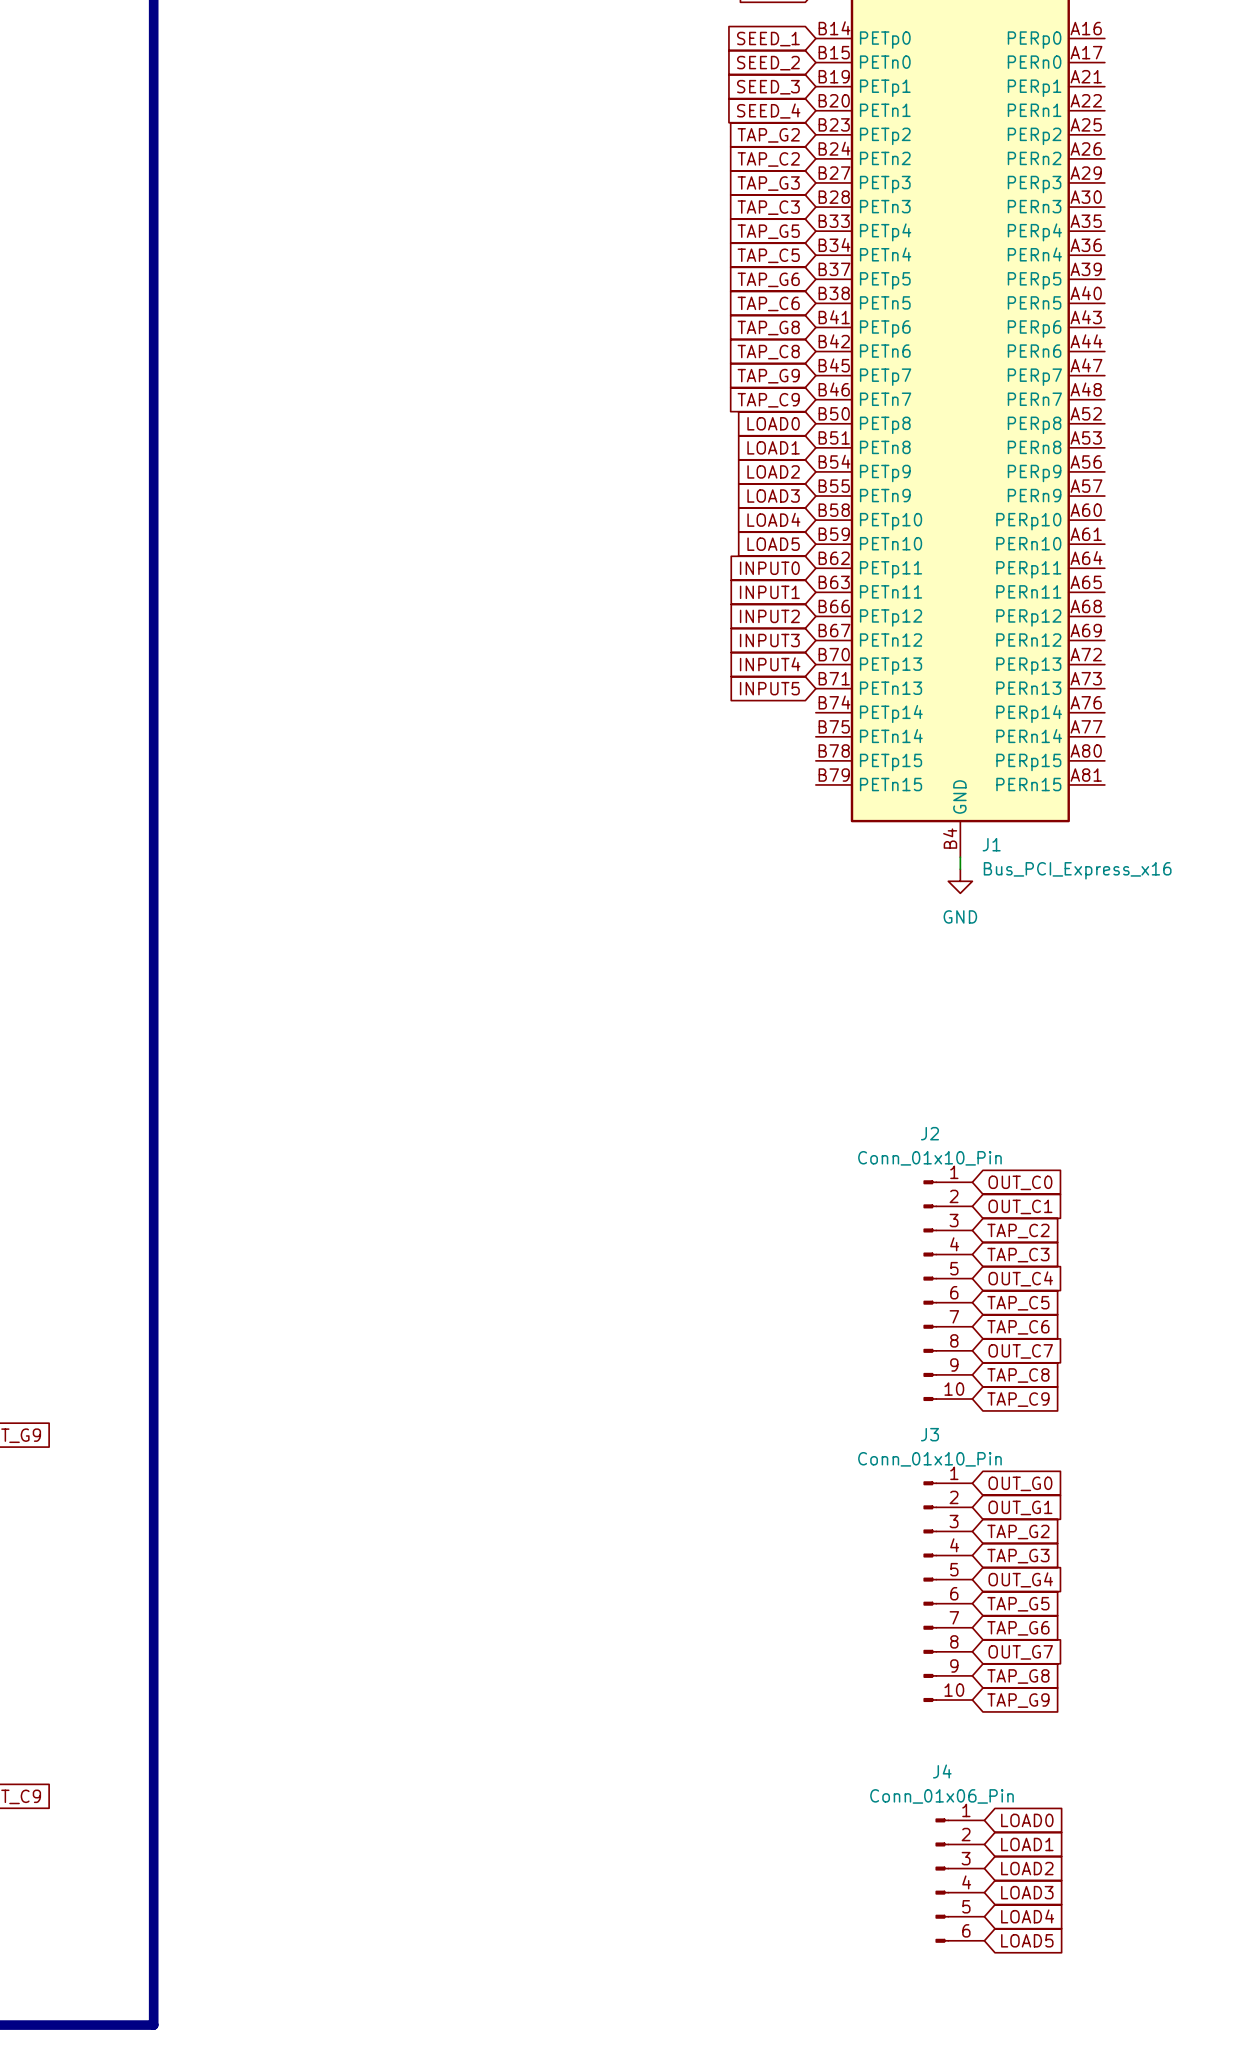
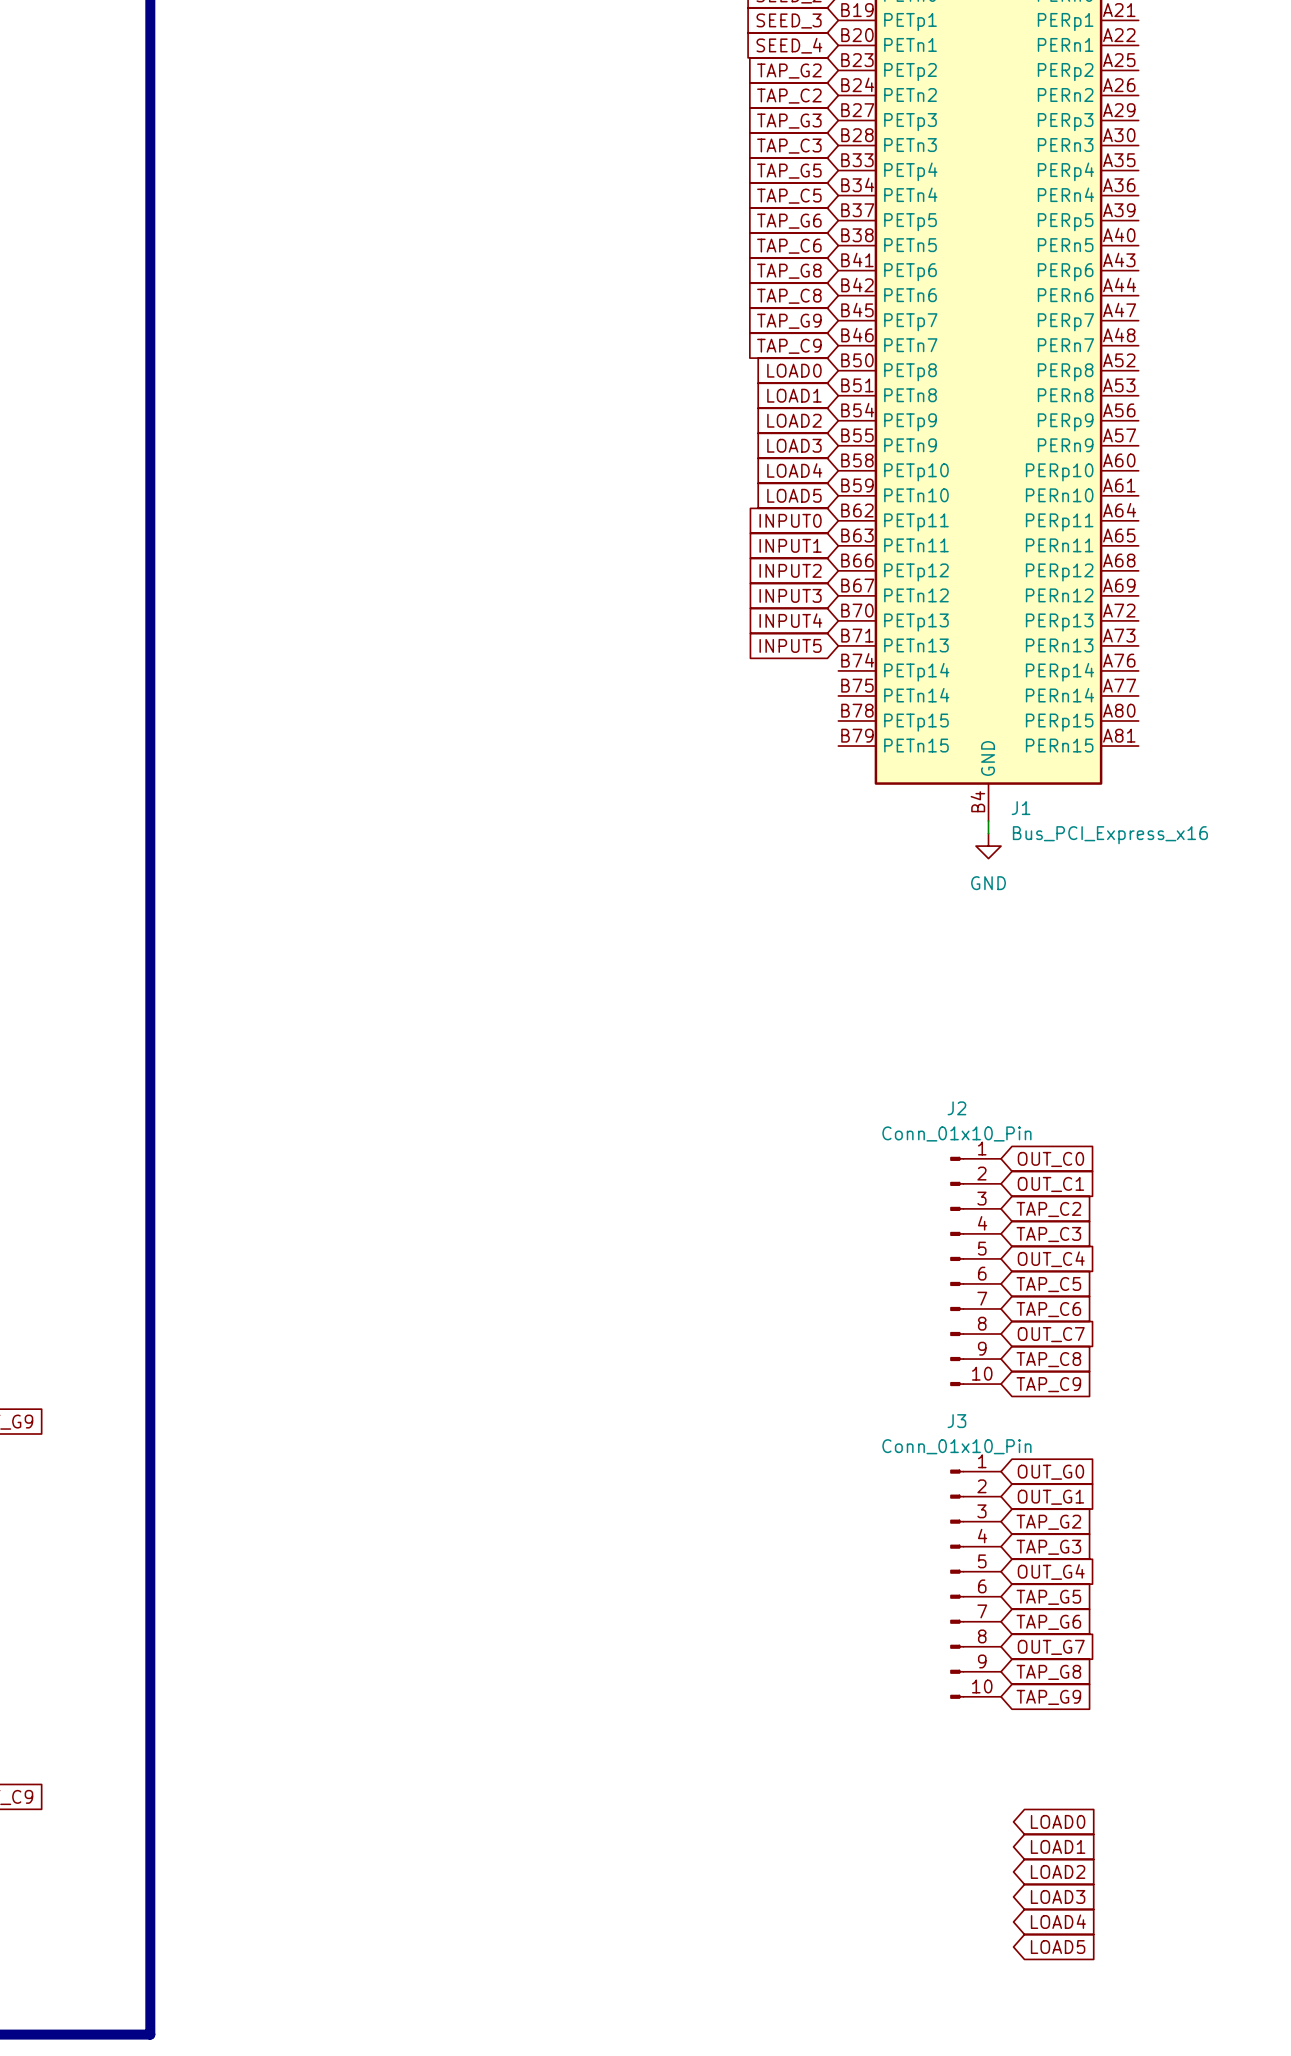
J4: Conn_01x06_Pin (960, 1880) -> none

